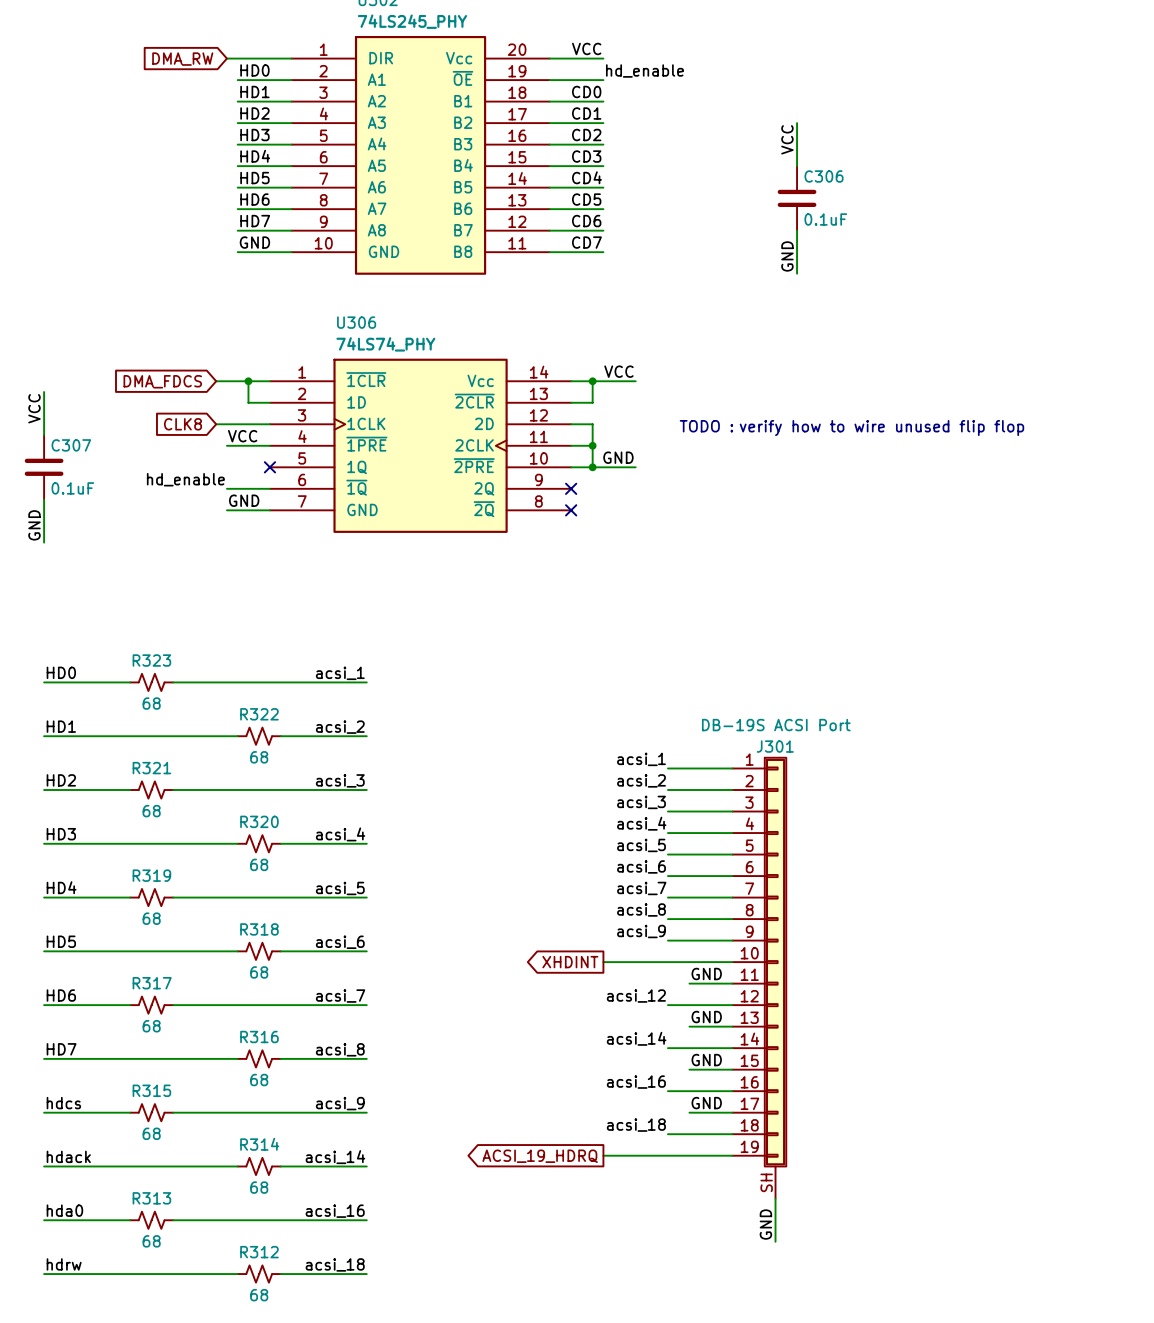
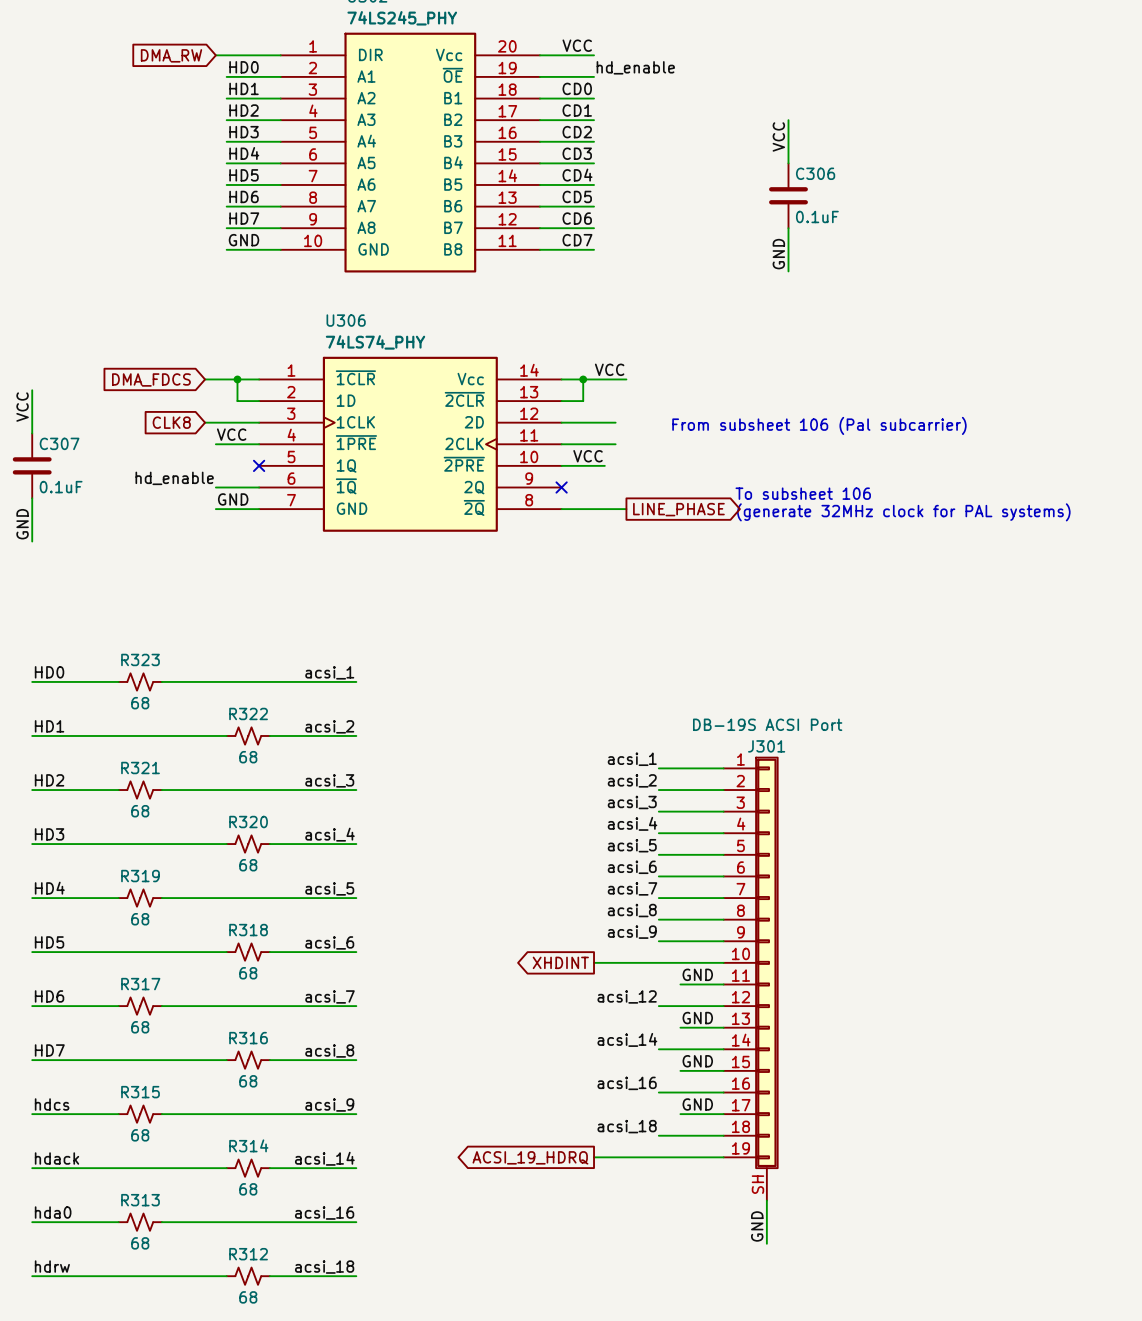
wire: (592, 424) (592, 467) -> (583, 422) (615, 422)
text: TODO : verify how to wire unused flip flop (851, 428) -> From subsheet 106 (Pal subcarrier) (819, 425)
wire: none -> (583, 444) (615, 444)
junction: (592, 445) -> none
label: none -> VCC (588, 456)
label: GND (618, 457) -> none
junction: (592, 467) -> none
wire: (614, 467) (635, 467) -> none
text: none -> To subsheet 106 (803, 493)
wire: none -> (561, 509) (626, 509)
no-connect mark: (571, 510) -> none
global label: none -> LINE_PHASE (678, 509)
text: none -> (generate 32MHz clock for PAL systems) (903, 512)

